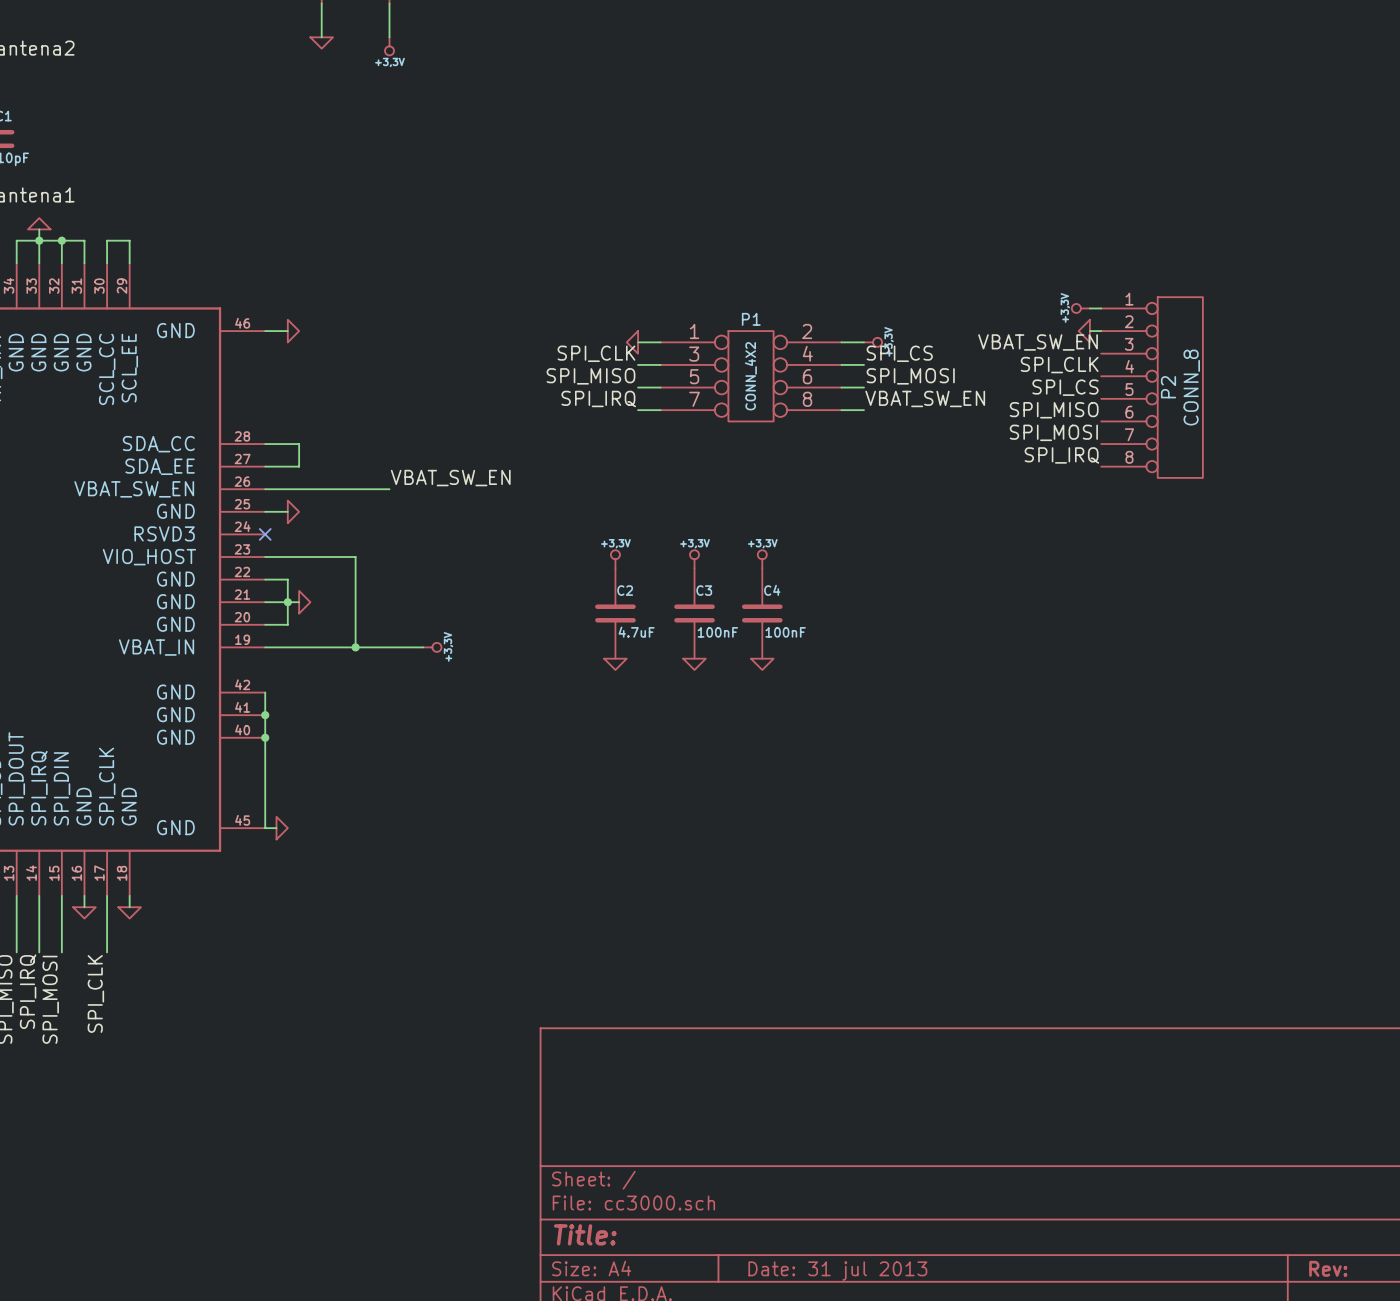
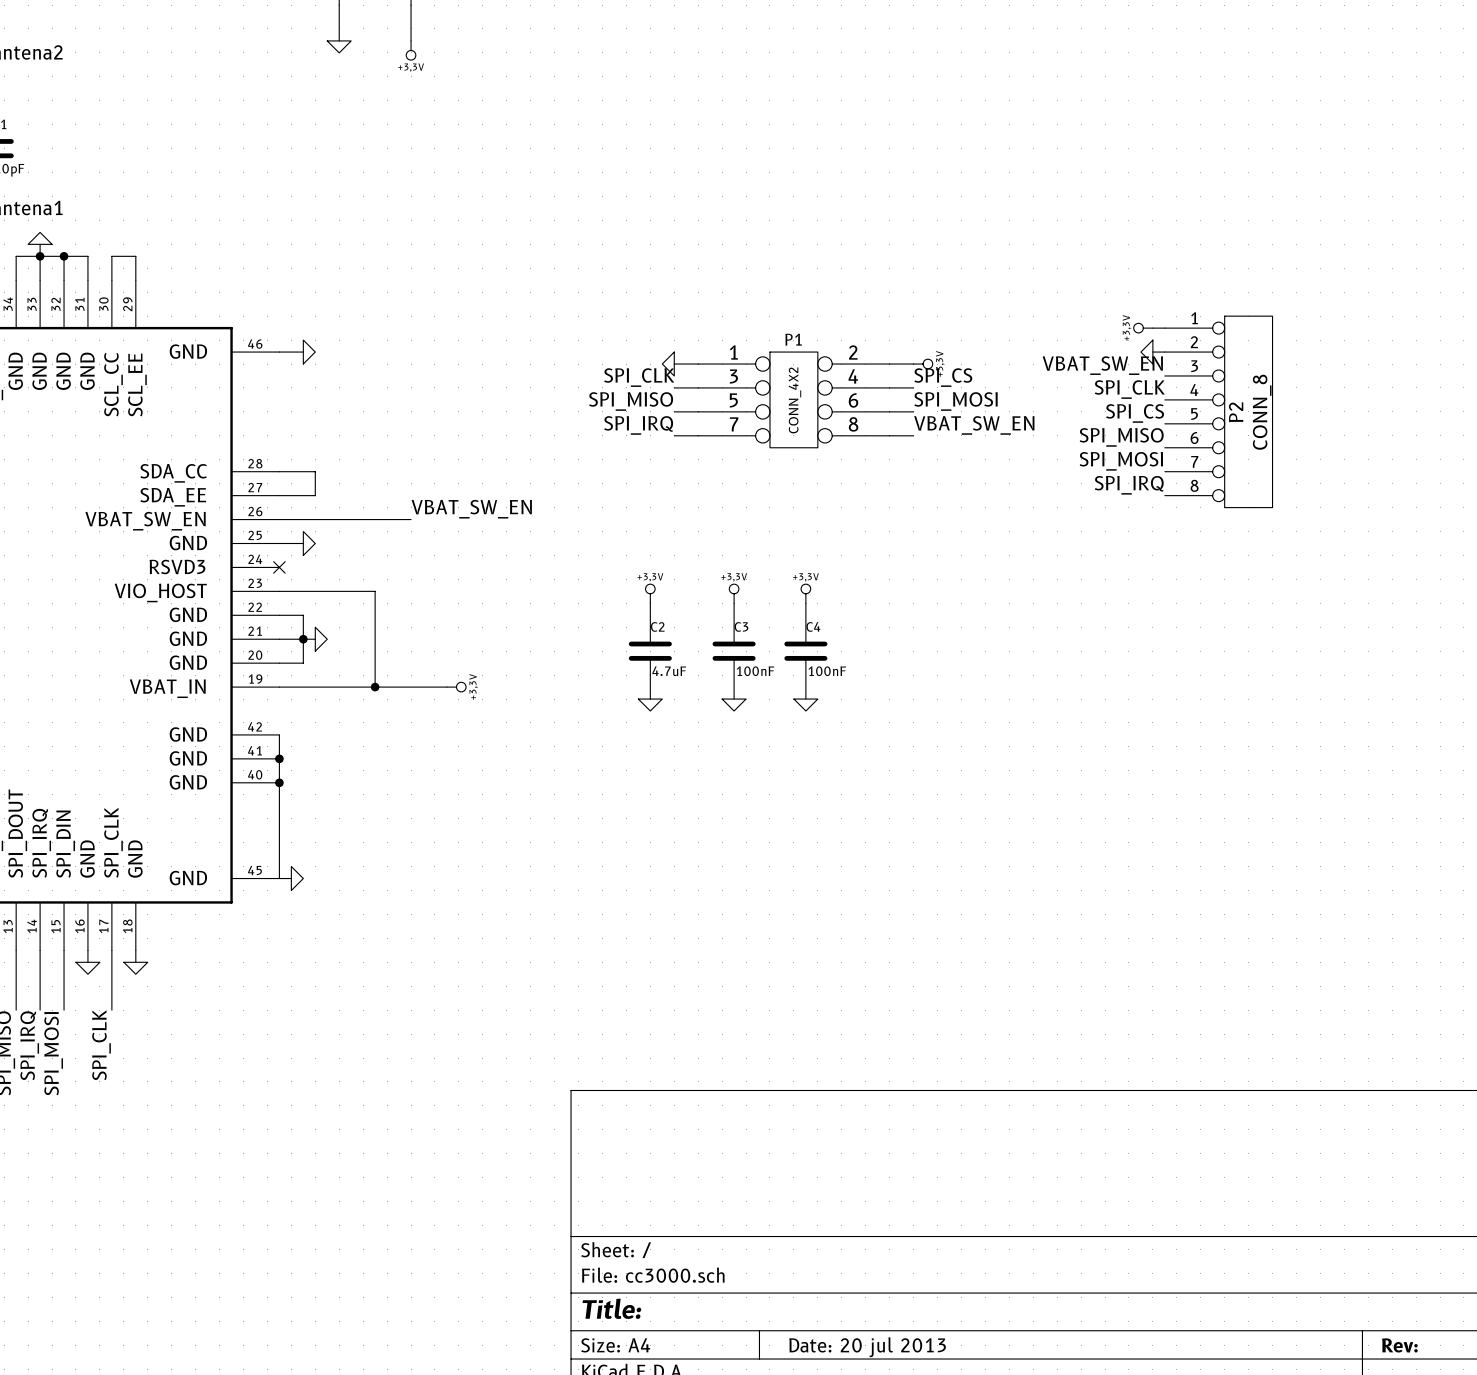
title block: Date: 31 jul 2013 (837, 1271) -> Date: 20 jul 2013 (867, 1347)

